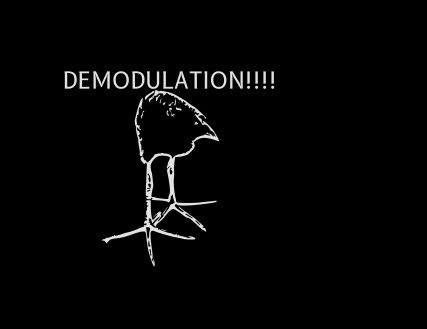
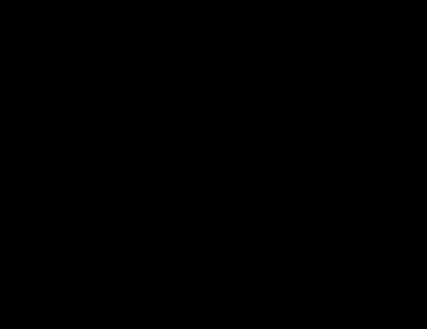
drawing: [101, 90, 220, 267] -> none

